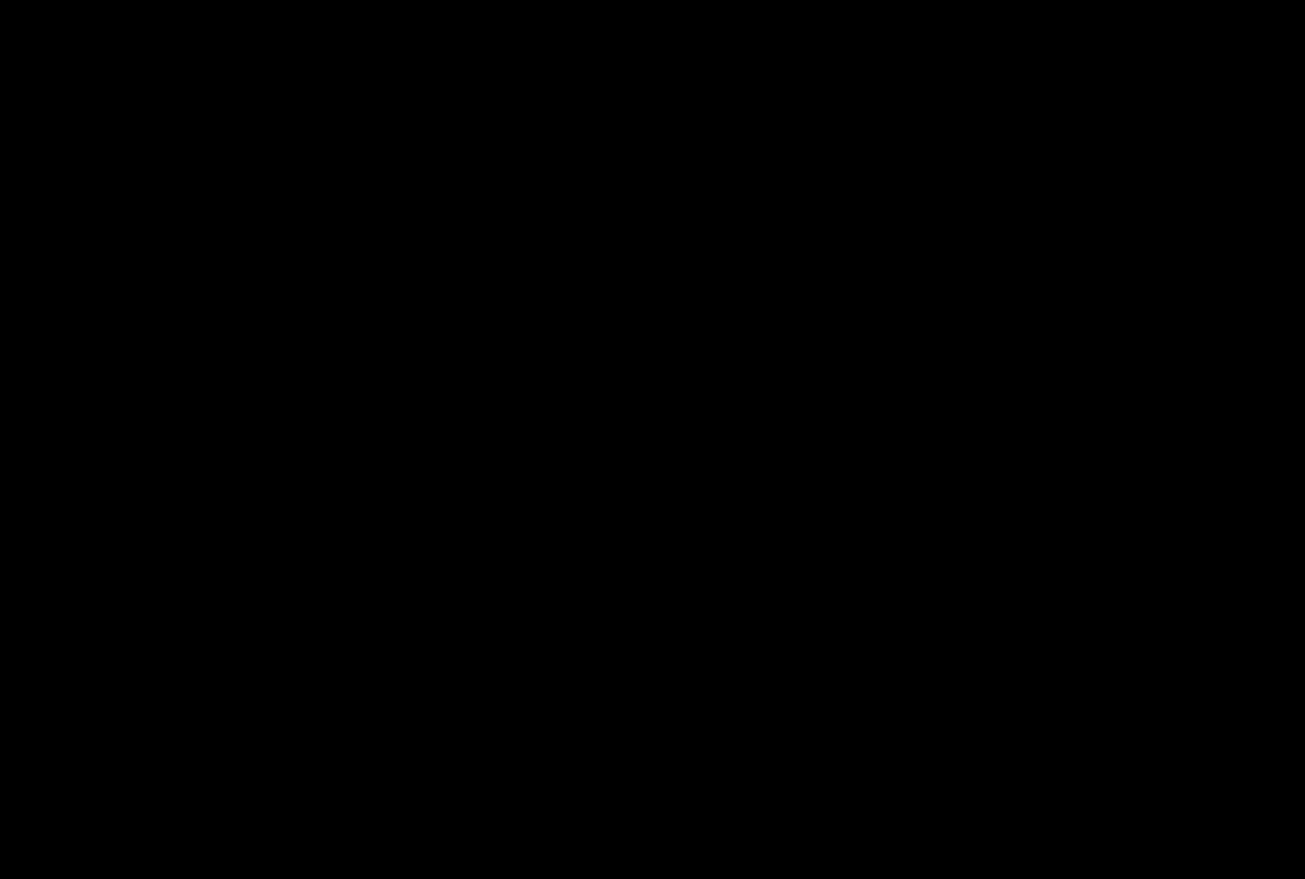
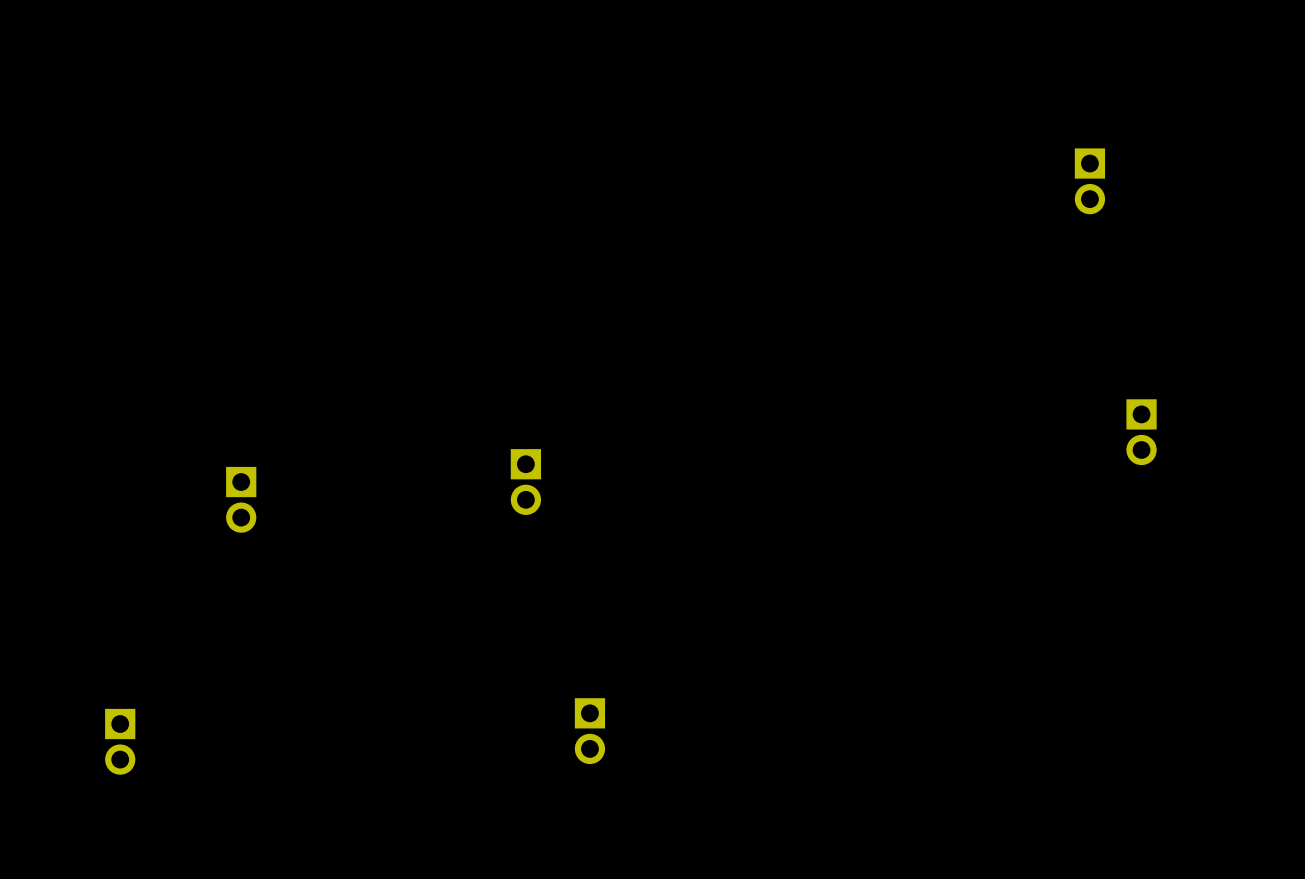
part: none -> (1089, 181)
part: none -> (1141, 432)
part: none -> (525, 482)
part: none -> (241, 499)
part: none -> (589, 731)
part: none -> (120, 741)

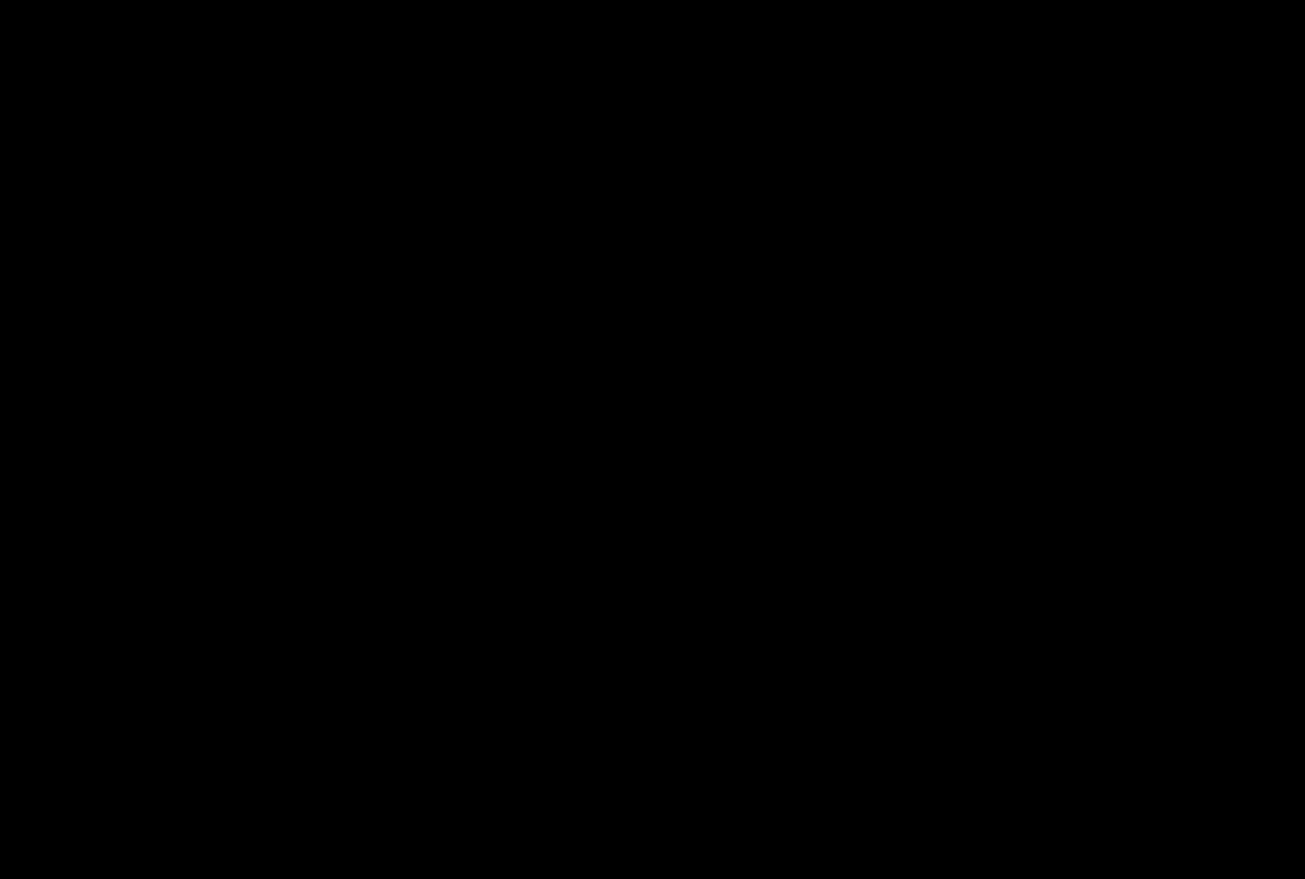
part: (1089, 181) -> none
part: (1141, 432) -> none
part: (525, 482) -> none
part: (241, 499) -> none
part: (589, 731) -> none
part: (120, 741) -> none

